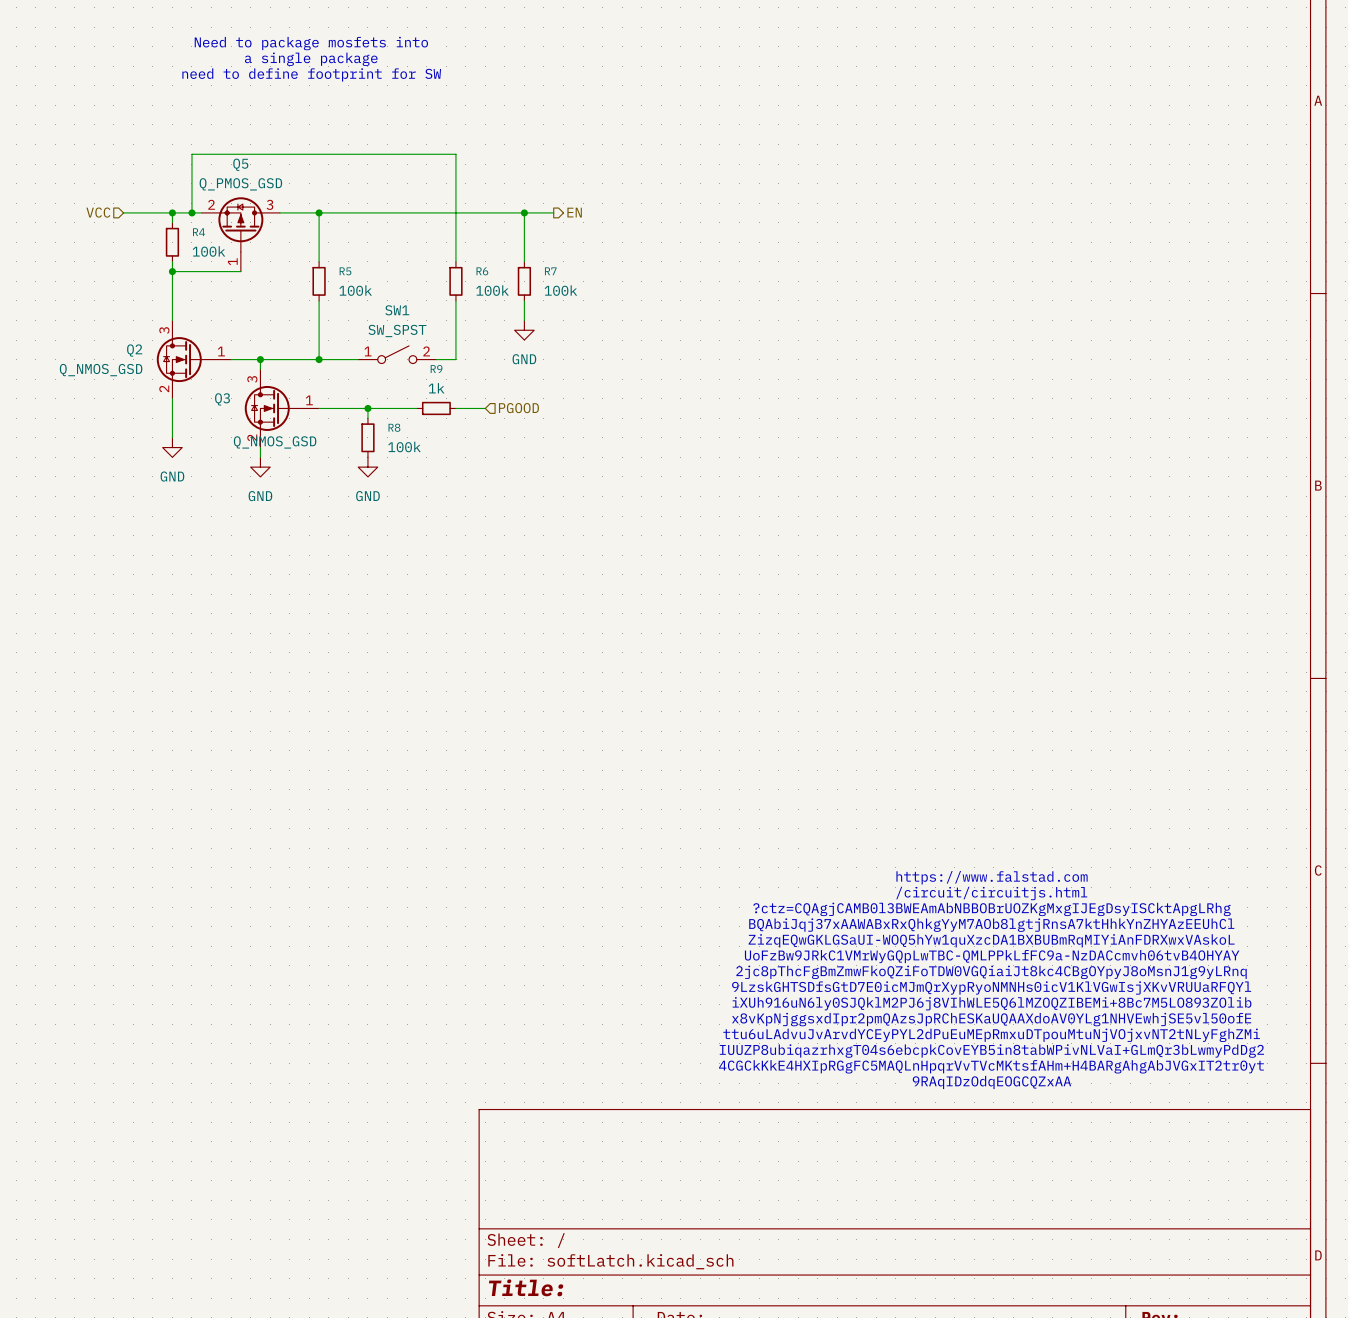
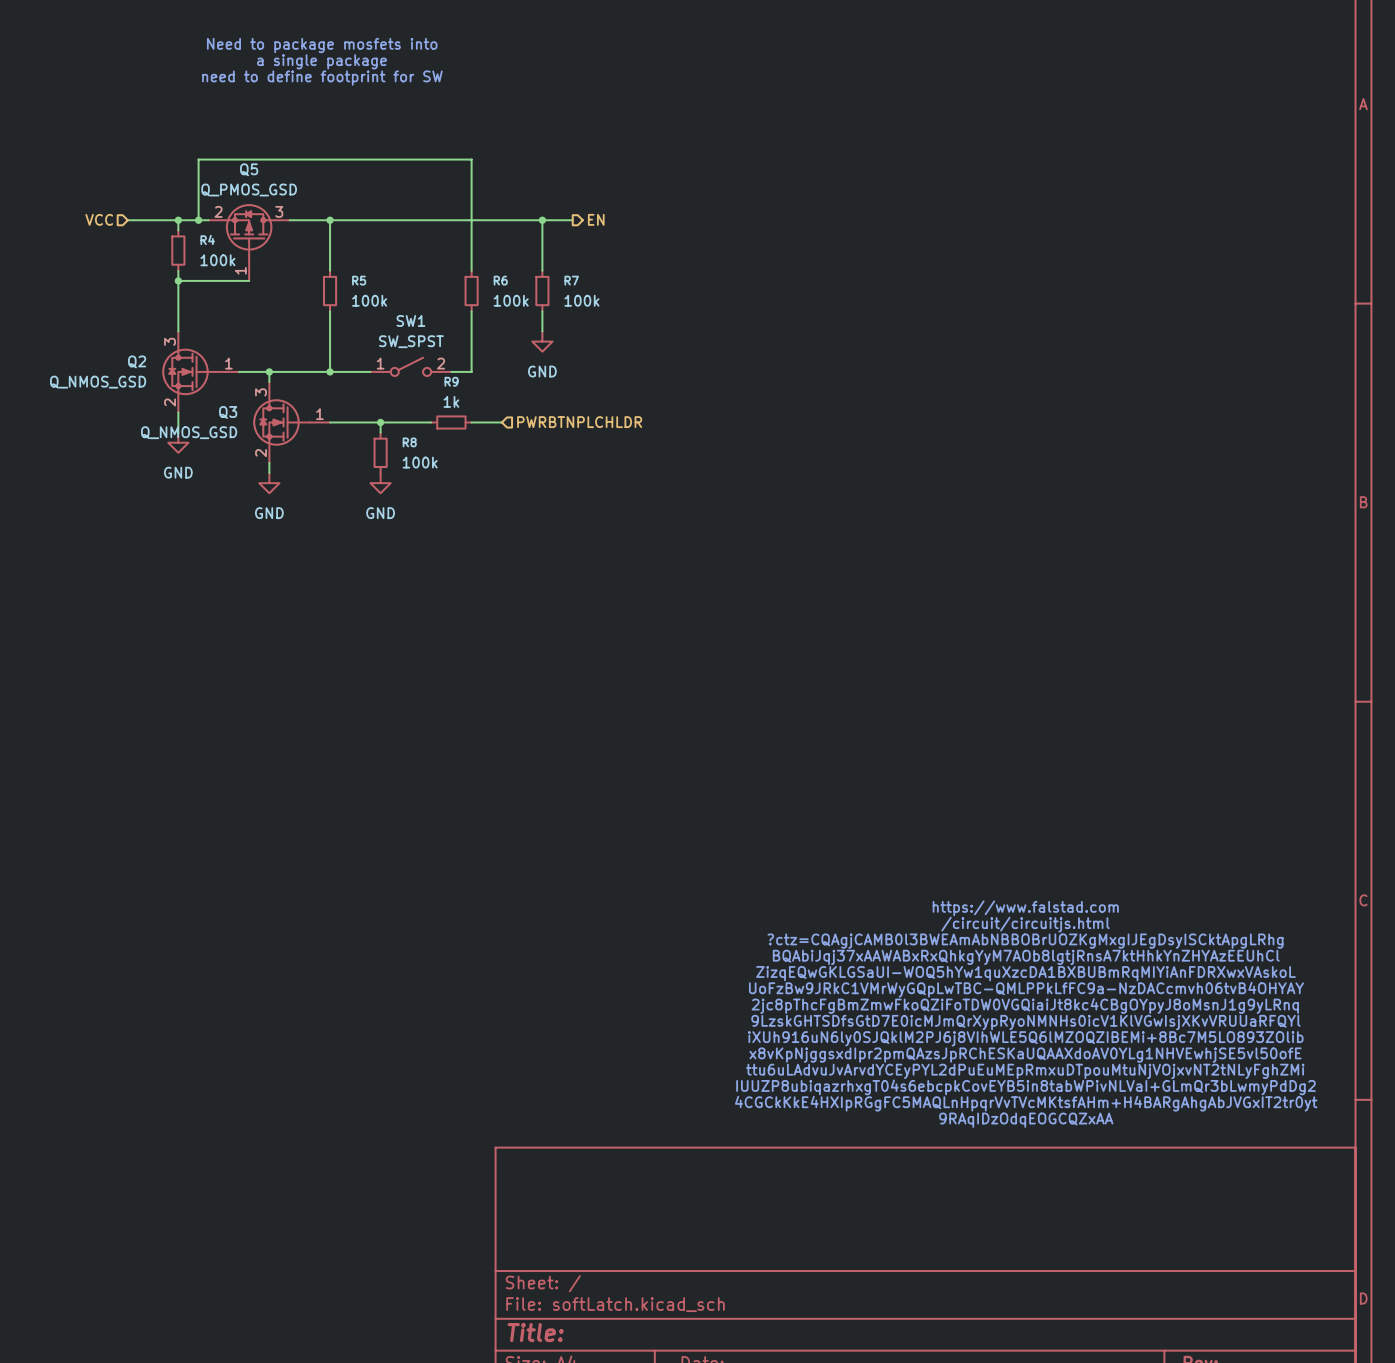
hierarchical label: PGOOD (518, 408) -> PWRBTNPLCHLDR (579, 422)
Q3 value position: Q_NMOS_GSD (275, 442) -> Q_NMOS_GSD (189, 432)
power symbol position: GND (172, 447) -> GND (178, 442)

